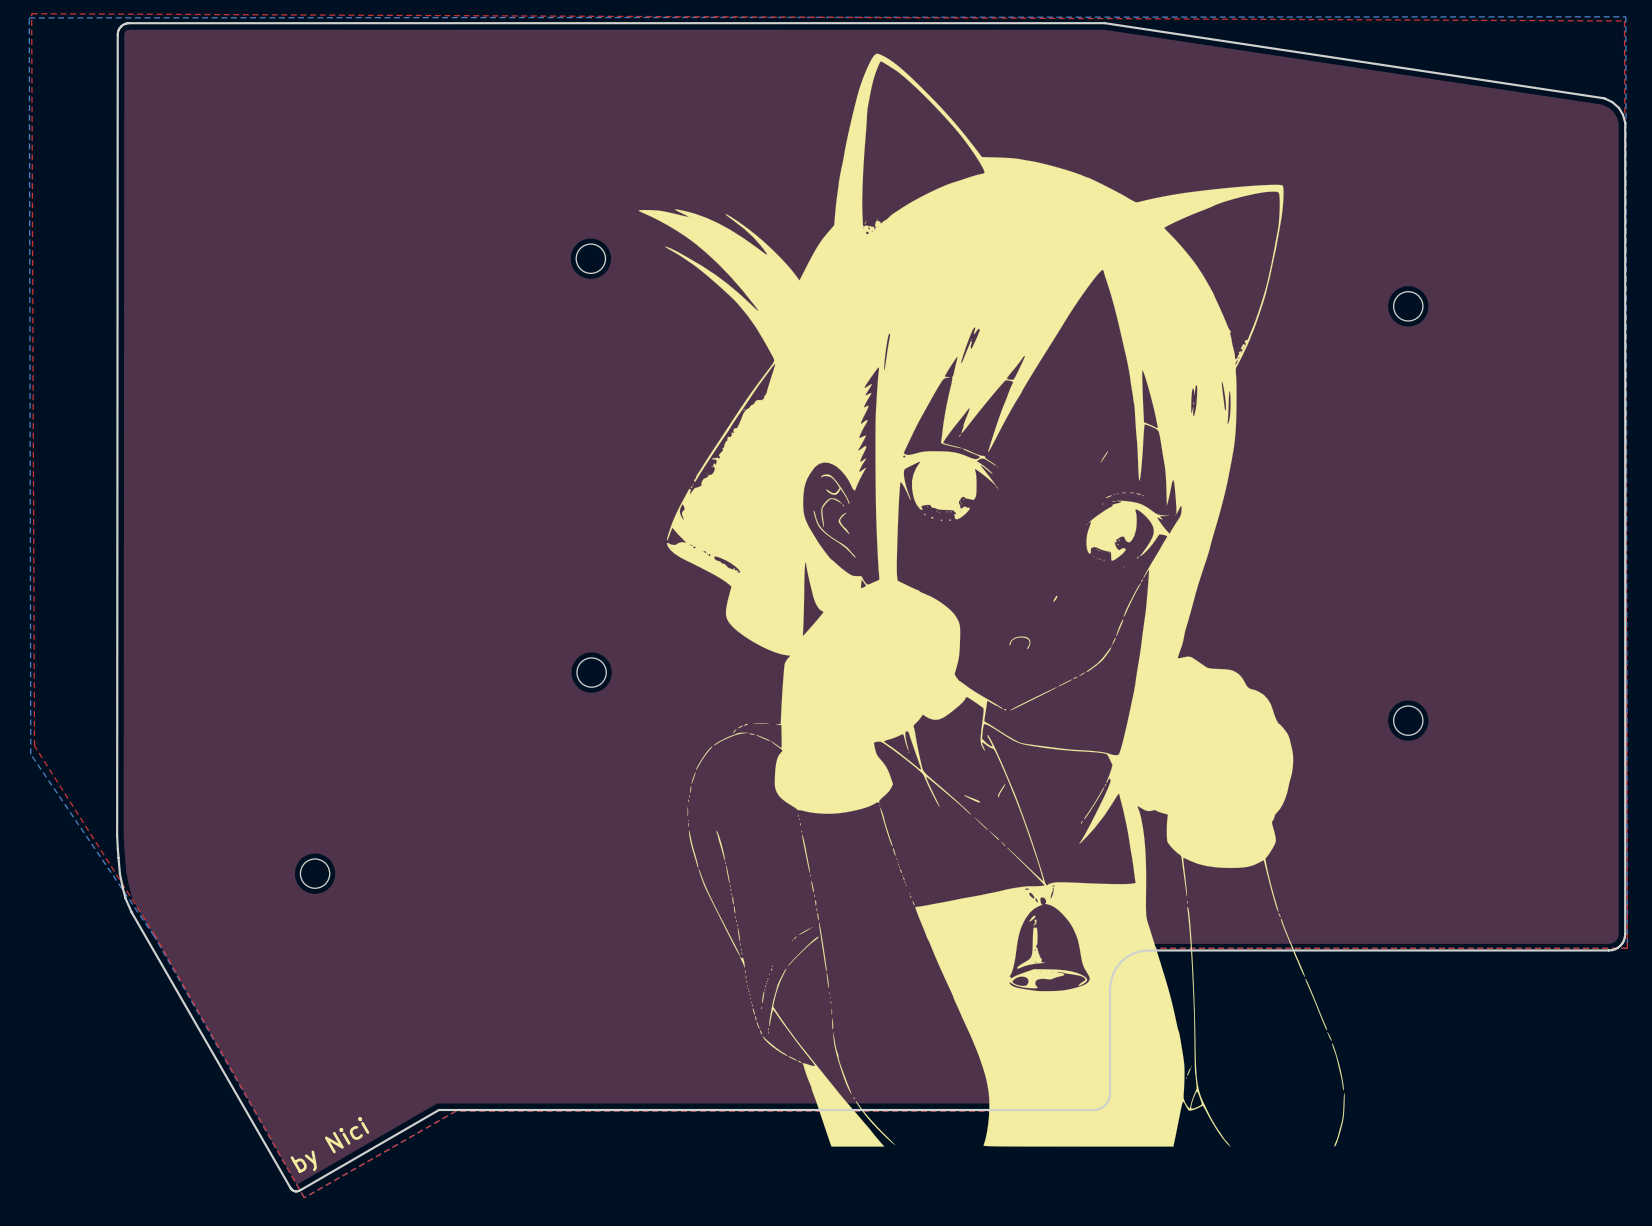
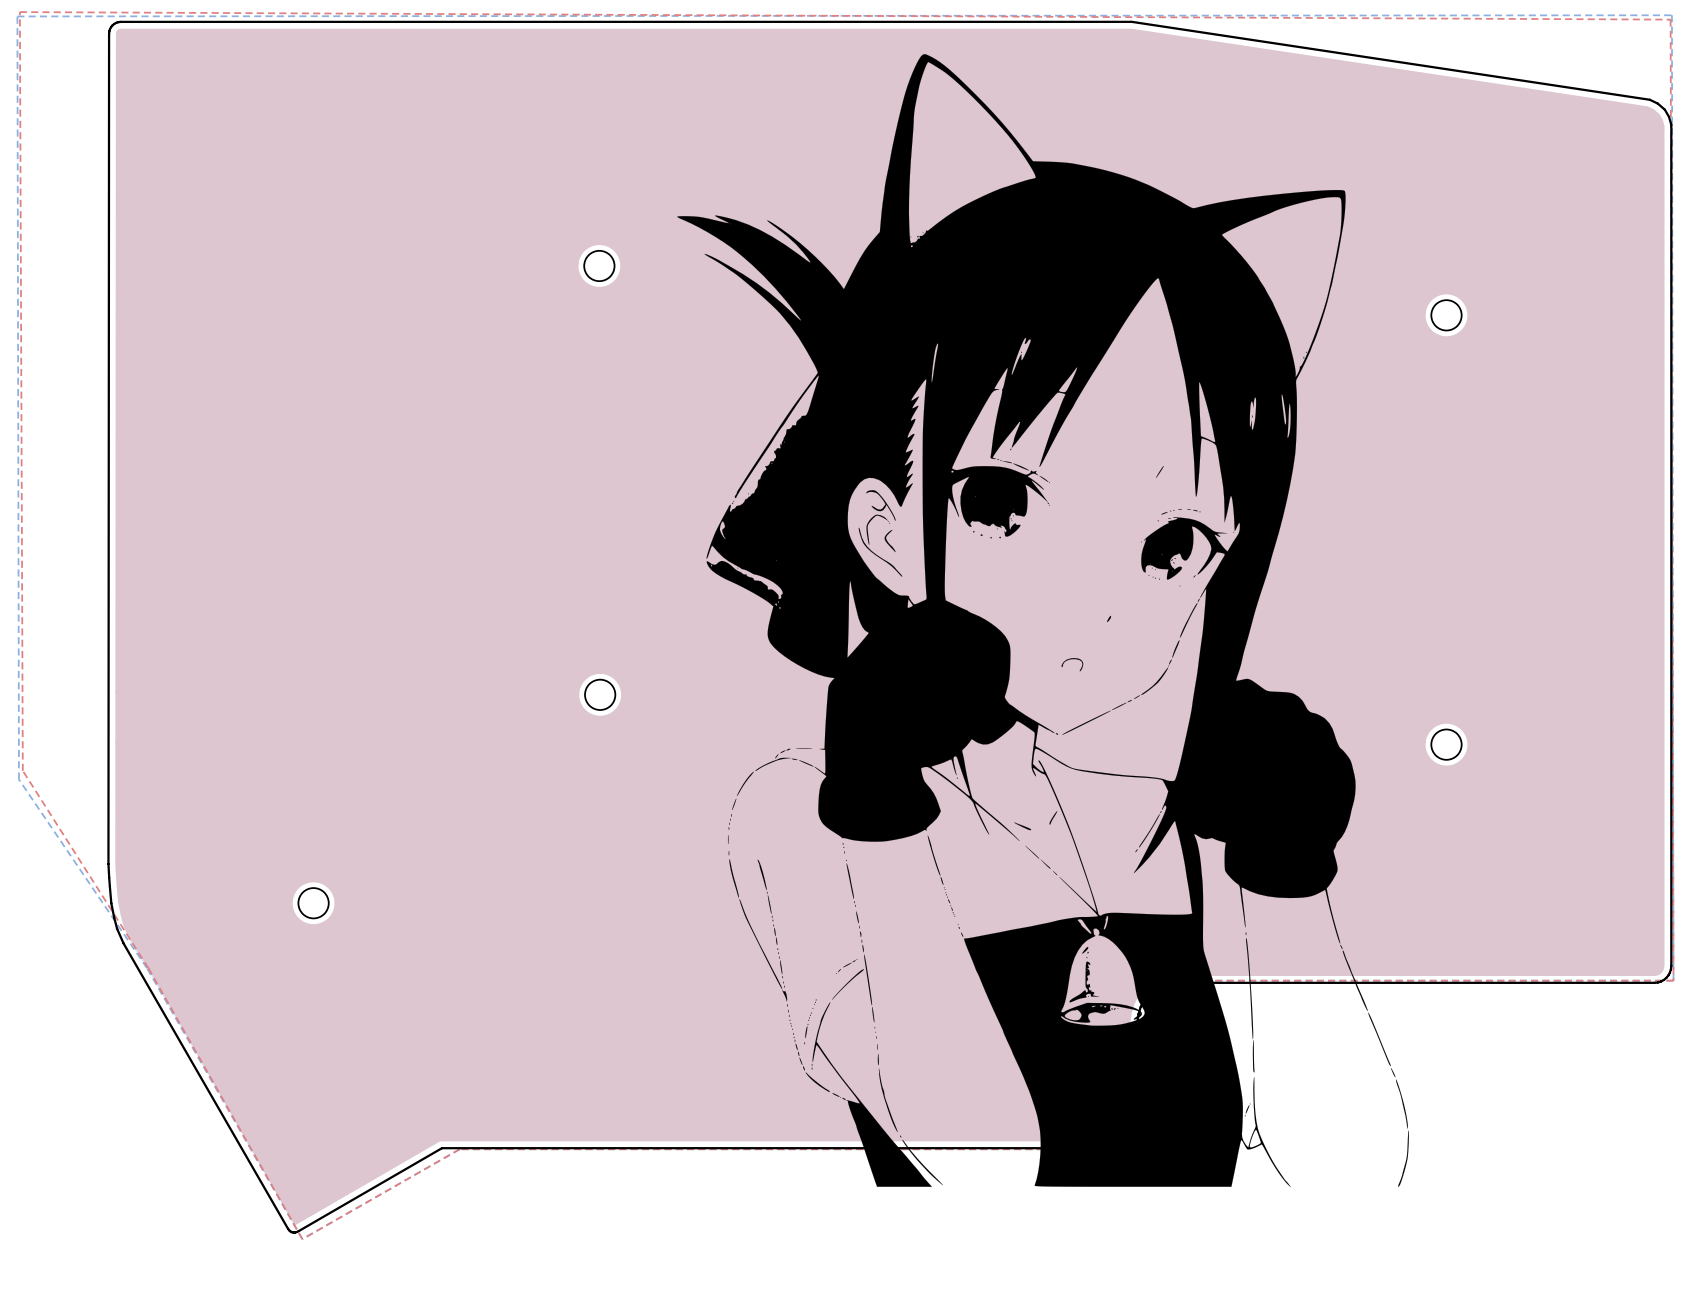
drawing: [638, 53, 1345, 1148] -> none
drawing: none -> [677, 54, 1409, 1188]
text: by Nici (329, 1145) -> none

